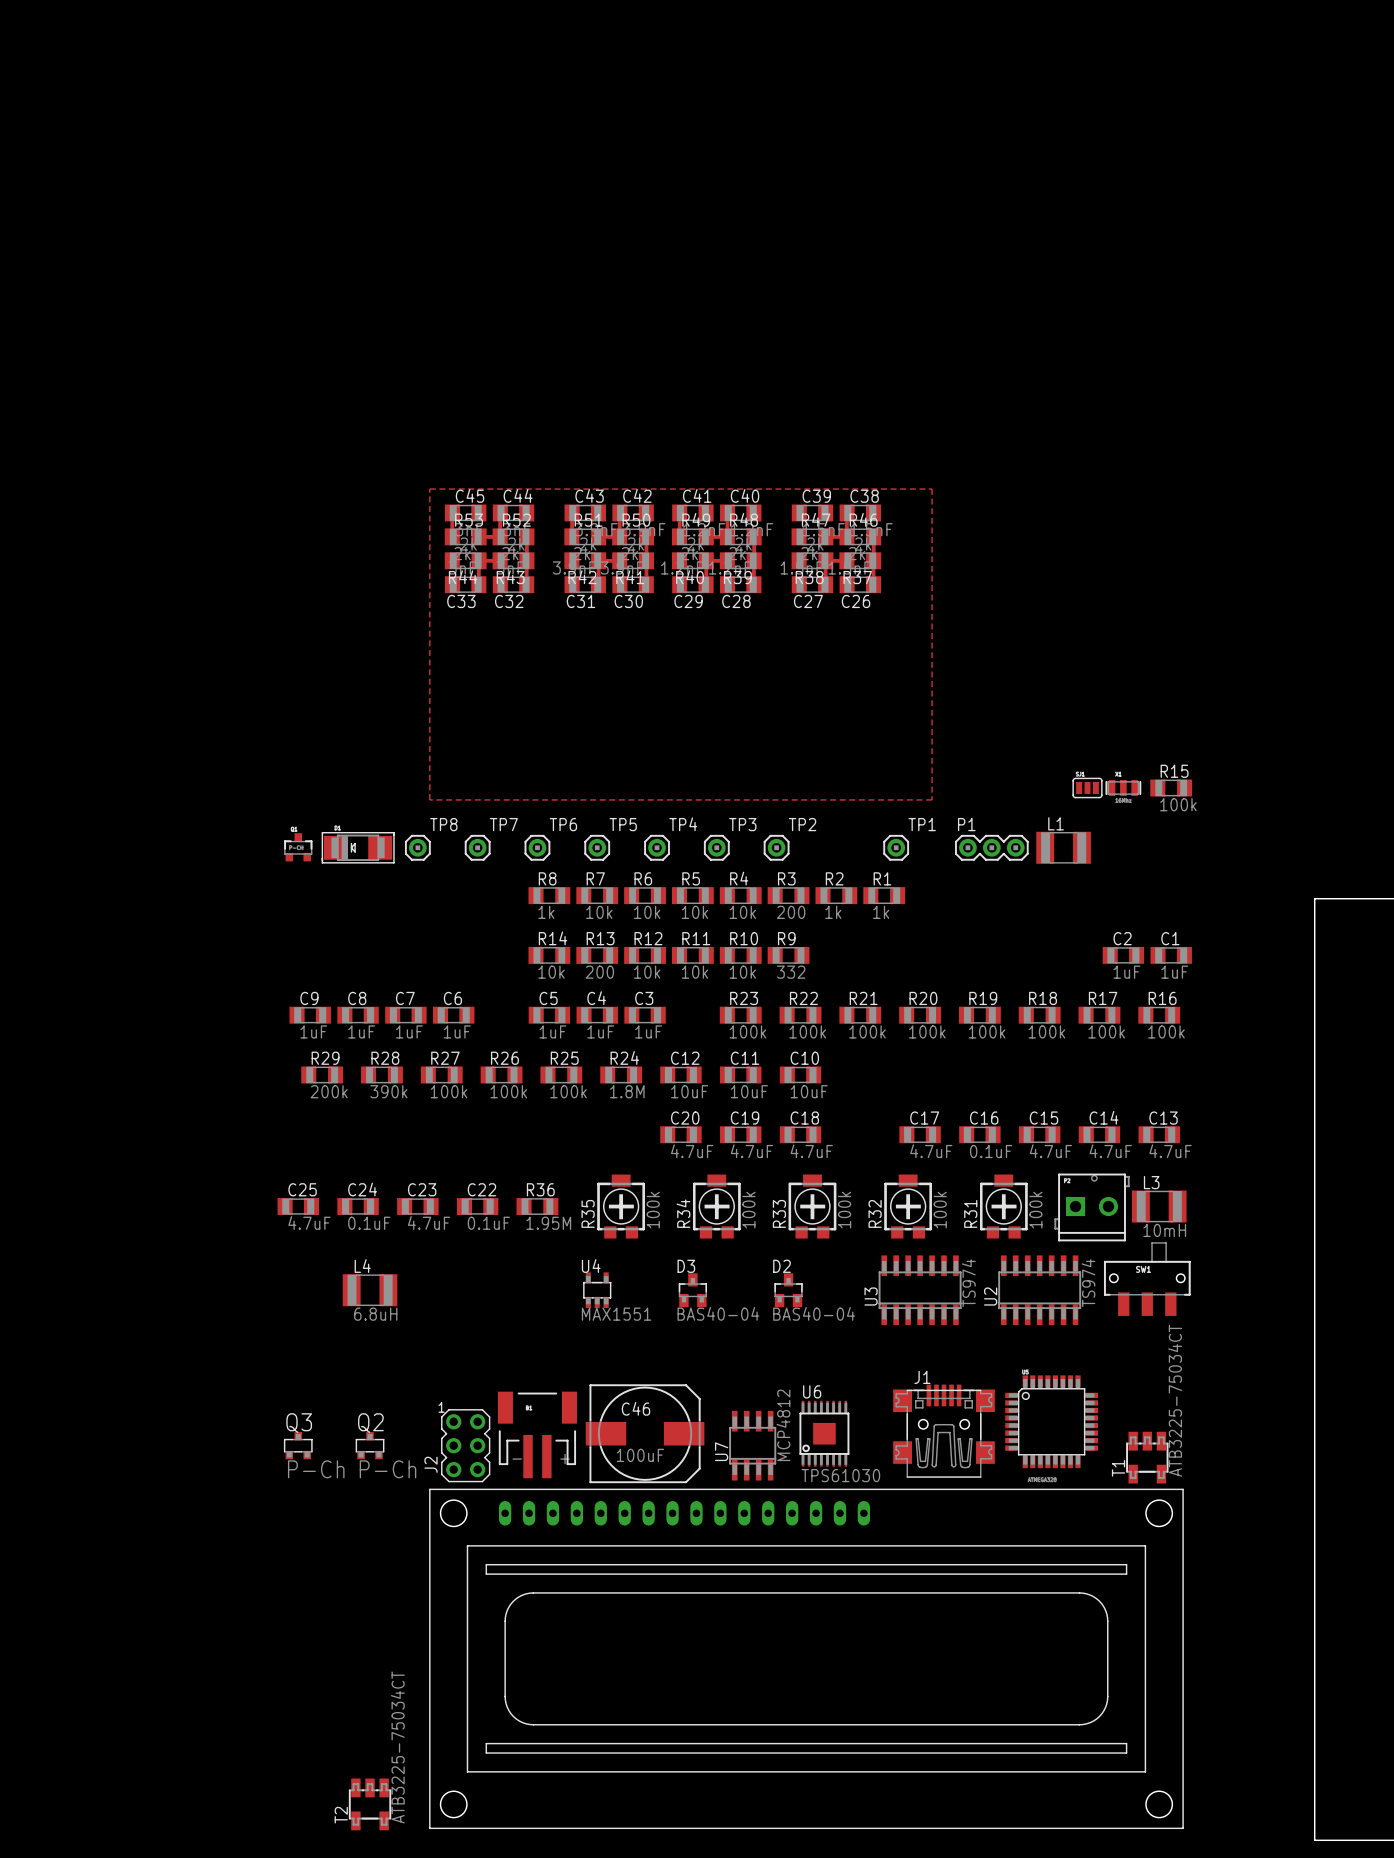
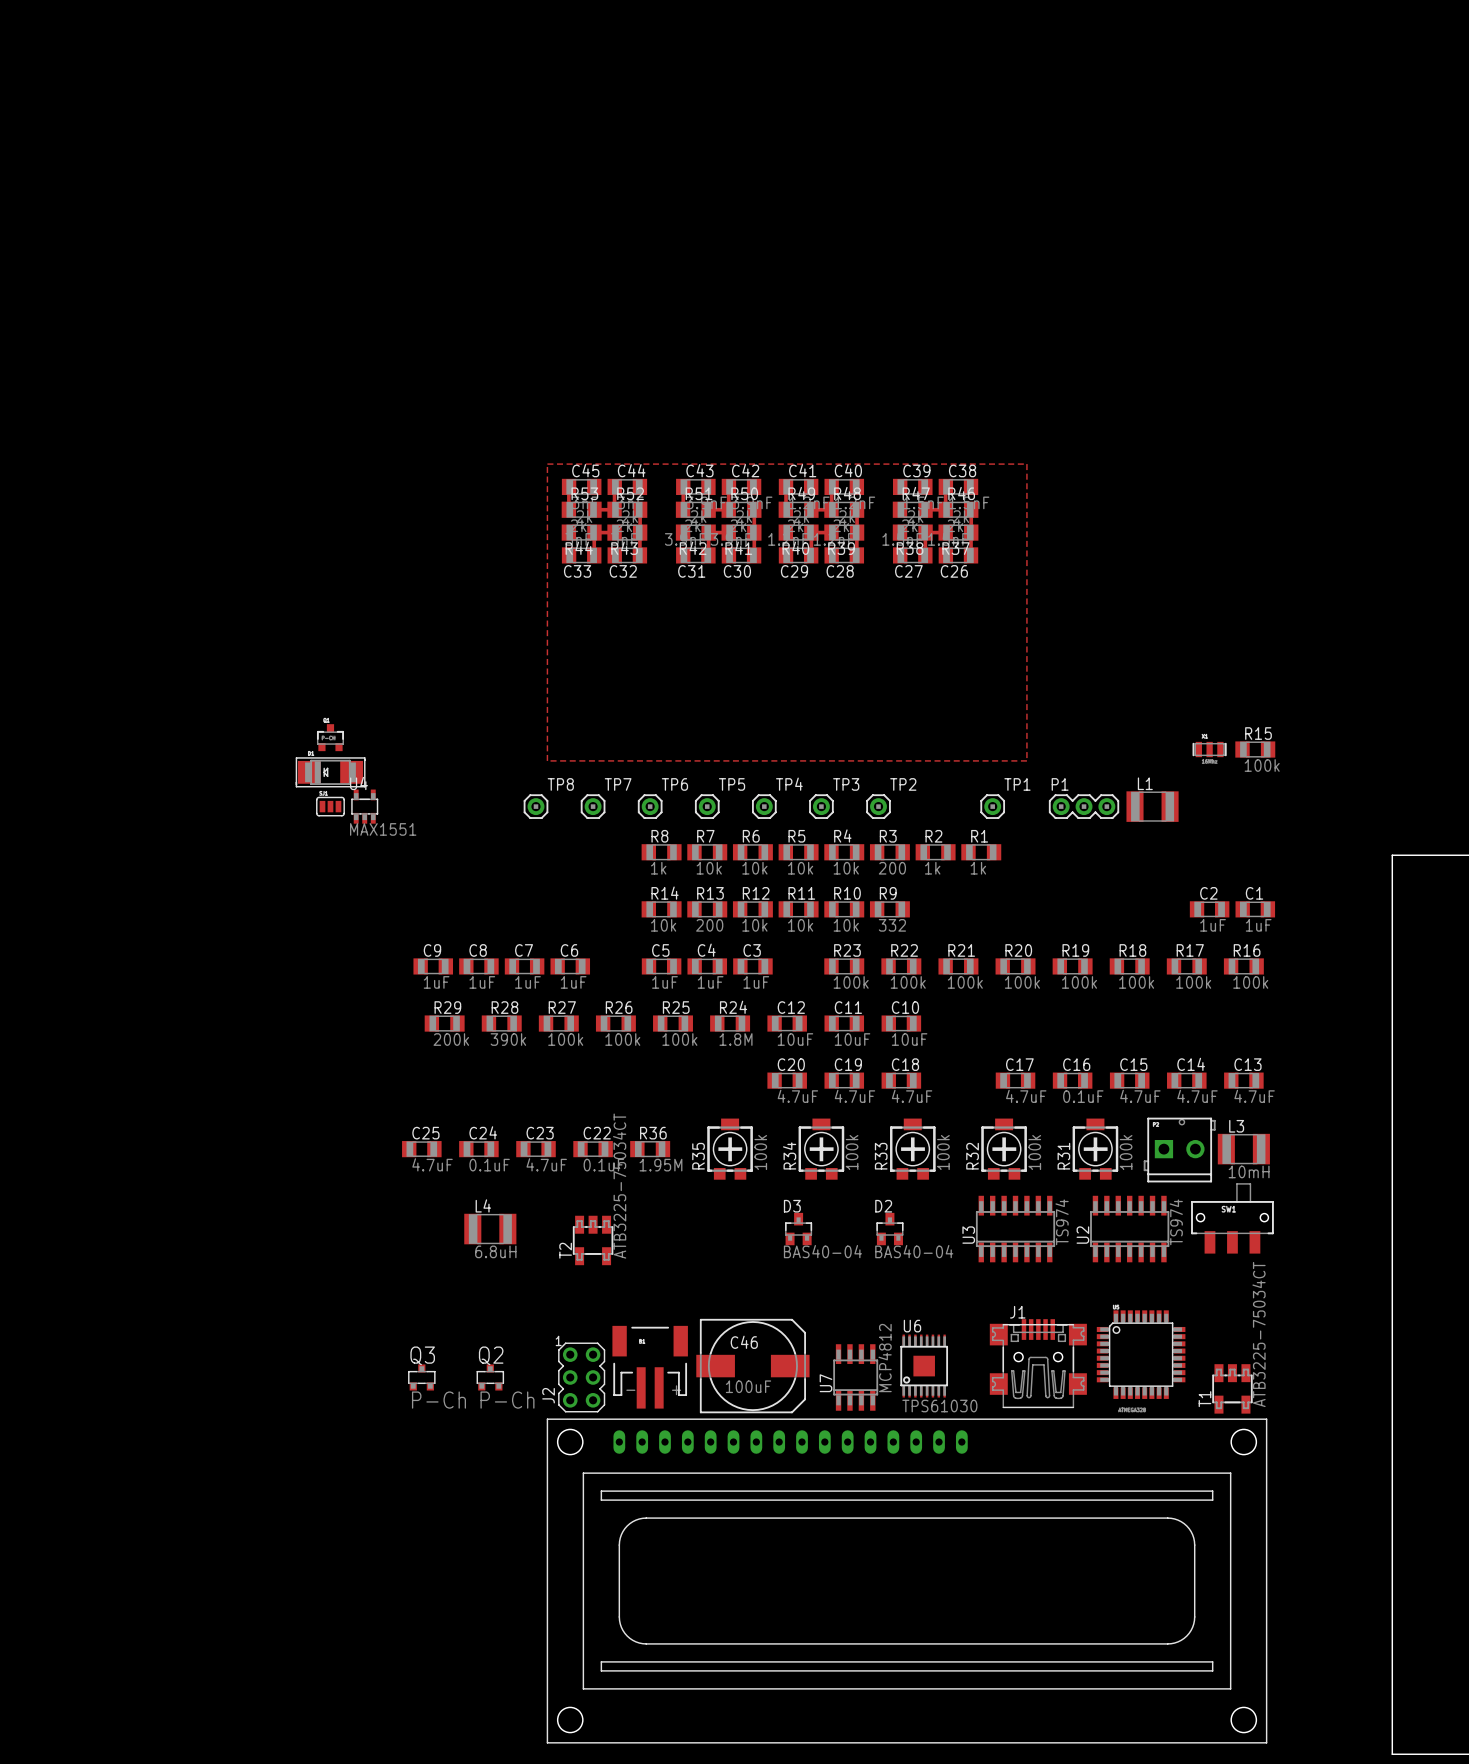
part position: (1087, 787) -> (330, 806)
part position: (298, 847) -> (330, 737)
part position: (358, 847) -> (330, 772)
U4 position: (597, 1290) -> (364, 806)
T2 position: (370, 1804) -> (593, 1240)

